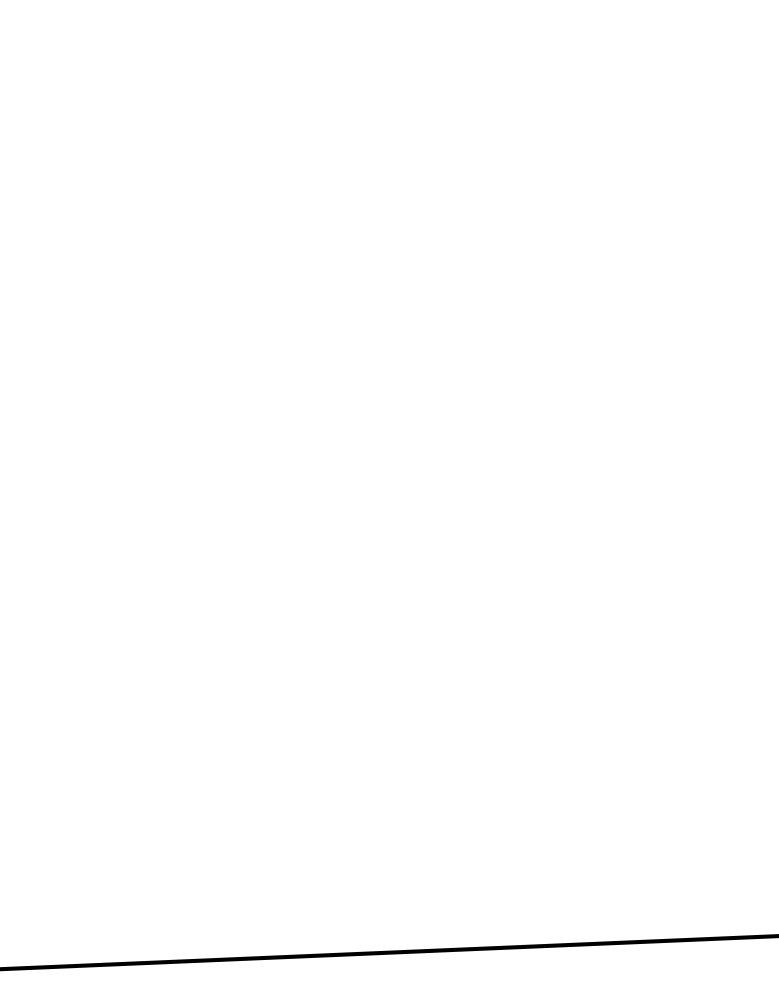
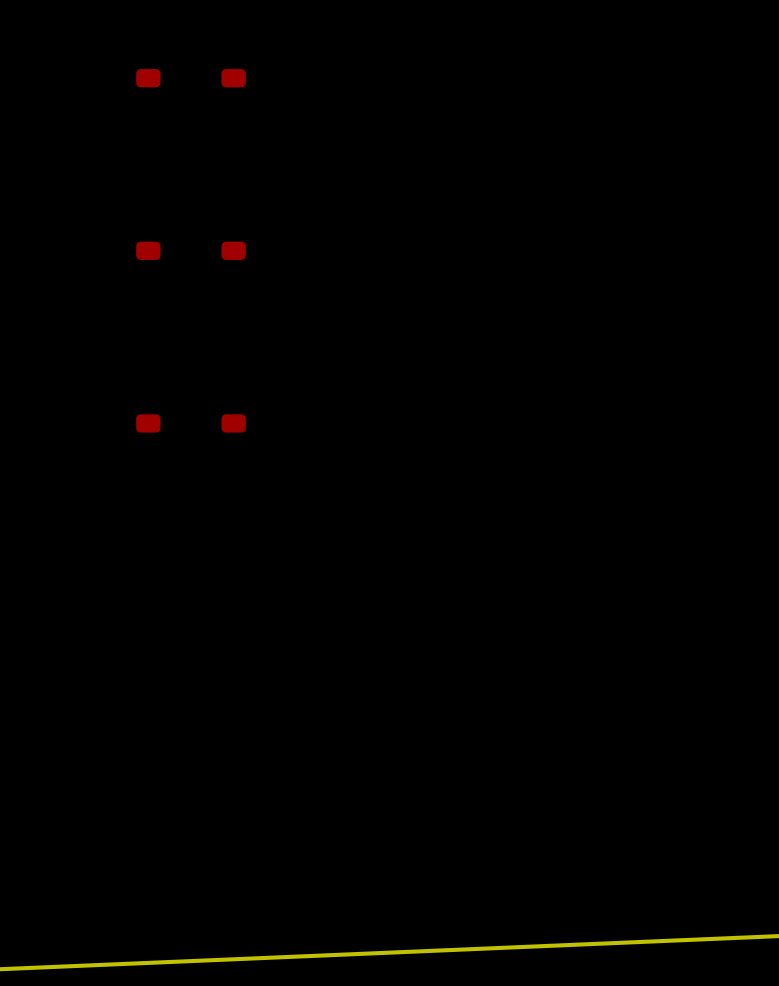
part: none -> (190, 78)
part: none -> (190, 250)
part: none -> (190, 423)

